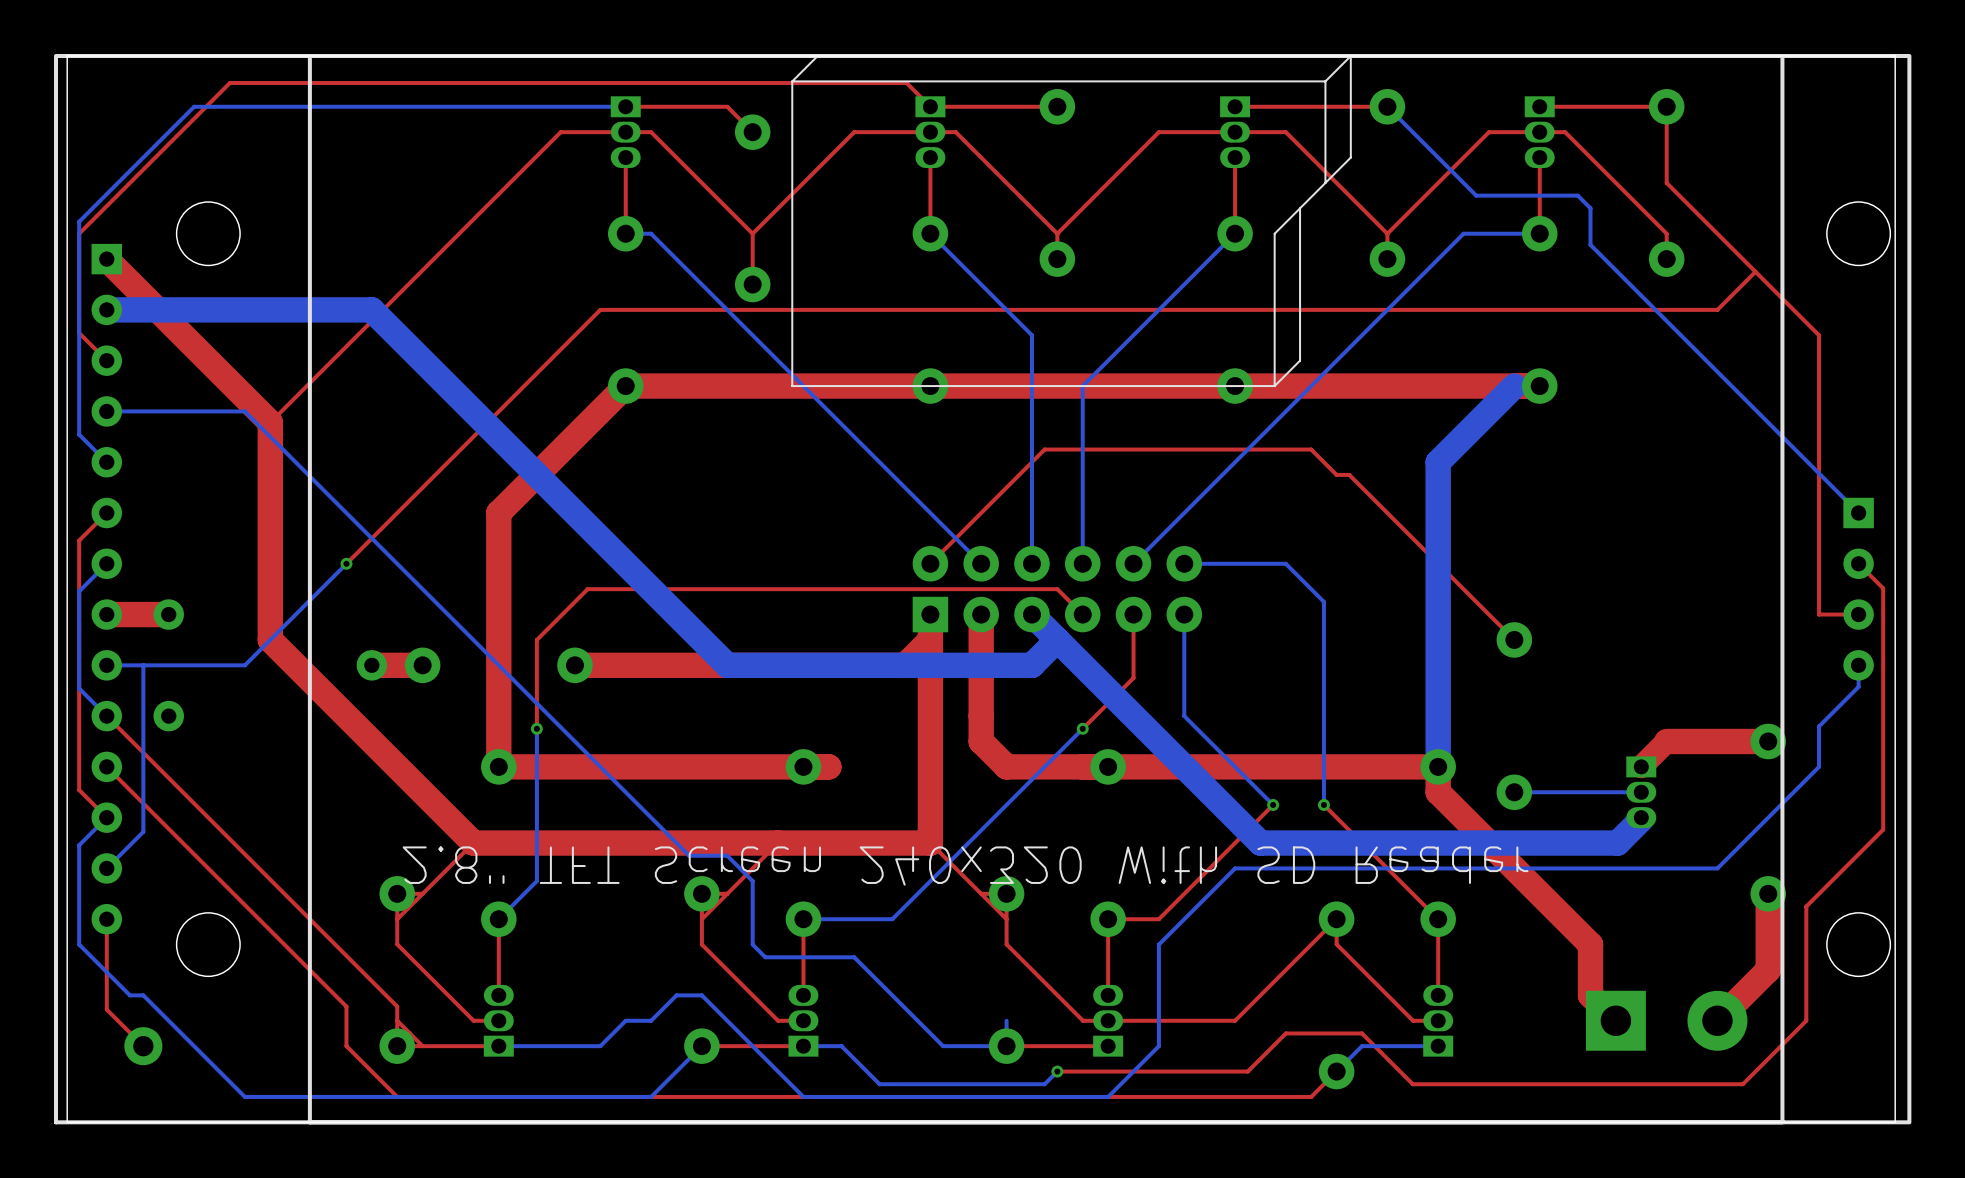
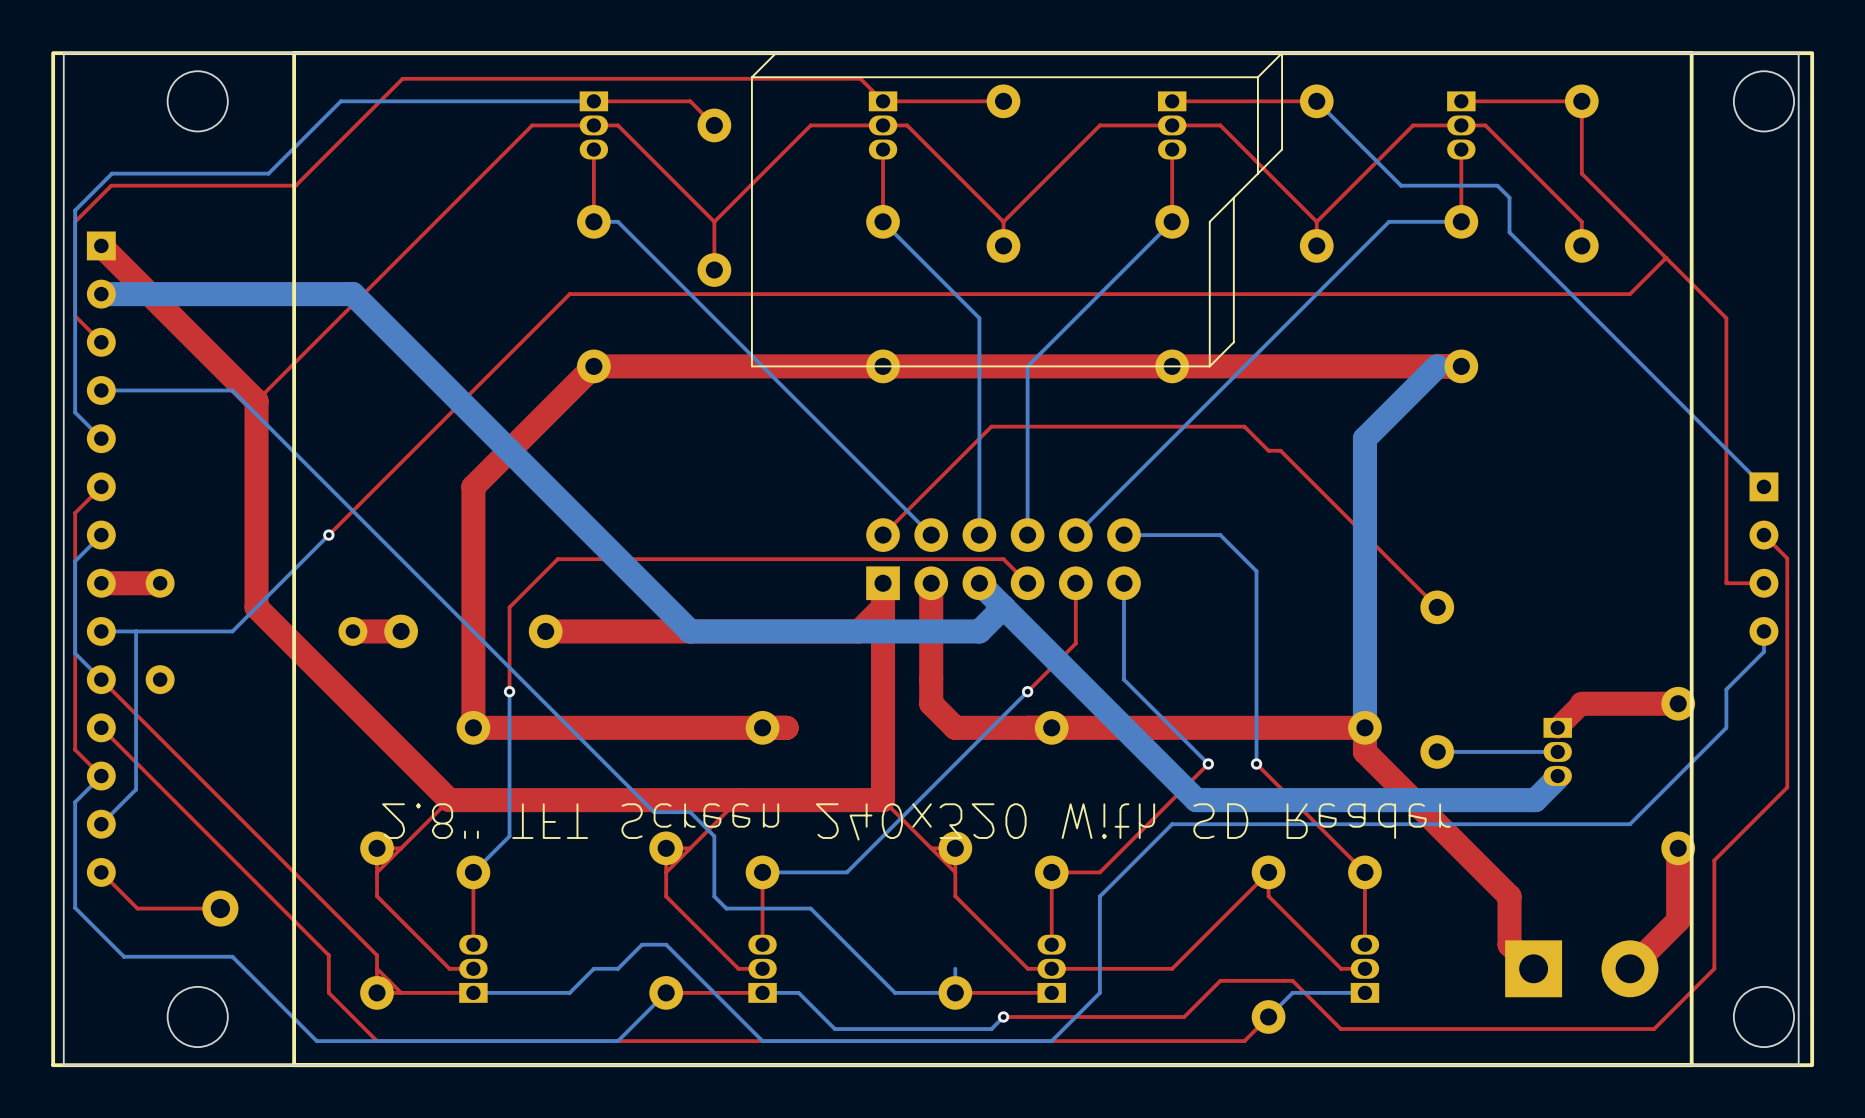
part footprint: [54, 54, 1912, 1125] -> [51, 51, 1815, 1068]
top track: (424, 83) (229, 83) (117, 195) -> (402, 78) (295, 185) (111, 185)
bottom track: (359, 106) (194, 106) (117, 182) -> (340, 101) (268, 173) (111, 173)
top track: (106, 919) (106, 1009) (143, 1046) -> (101, 872) (137, 908) (220, 908)
bottom track: (79, 944) (129, 995) (143, 995) (244, 1096) (333, 1096) -> (75, 896) (75, 907) (124, 956) (232, 956) (316, 1041)
part position: (143, 1046) -> (220, 908)

